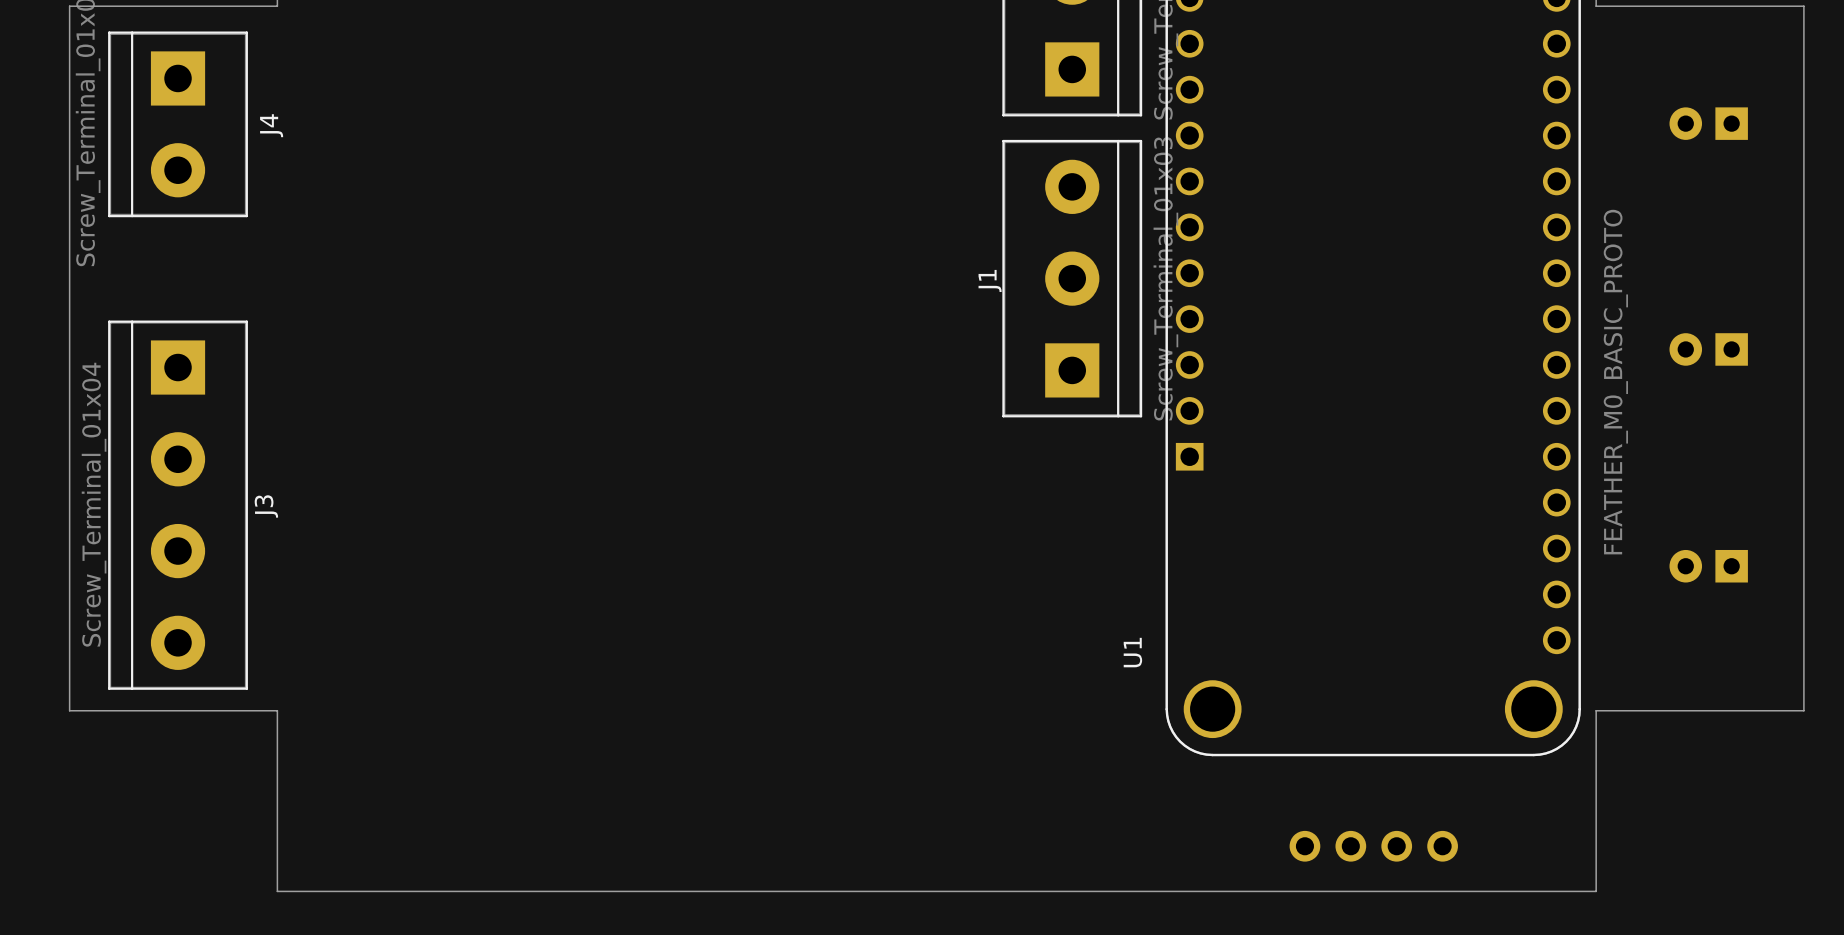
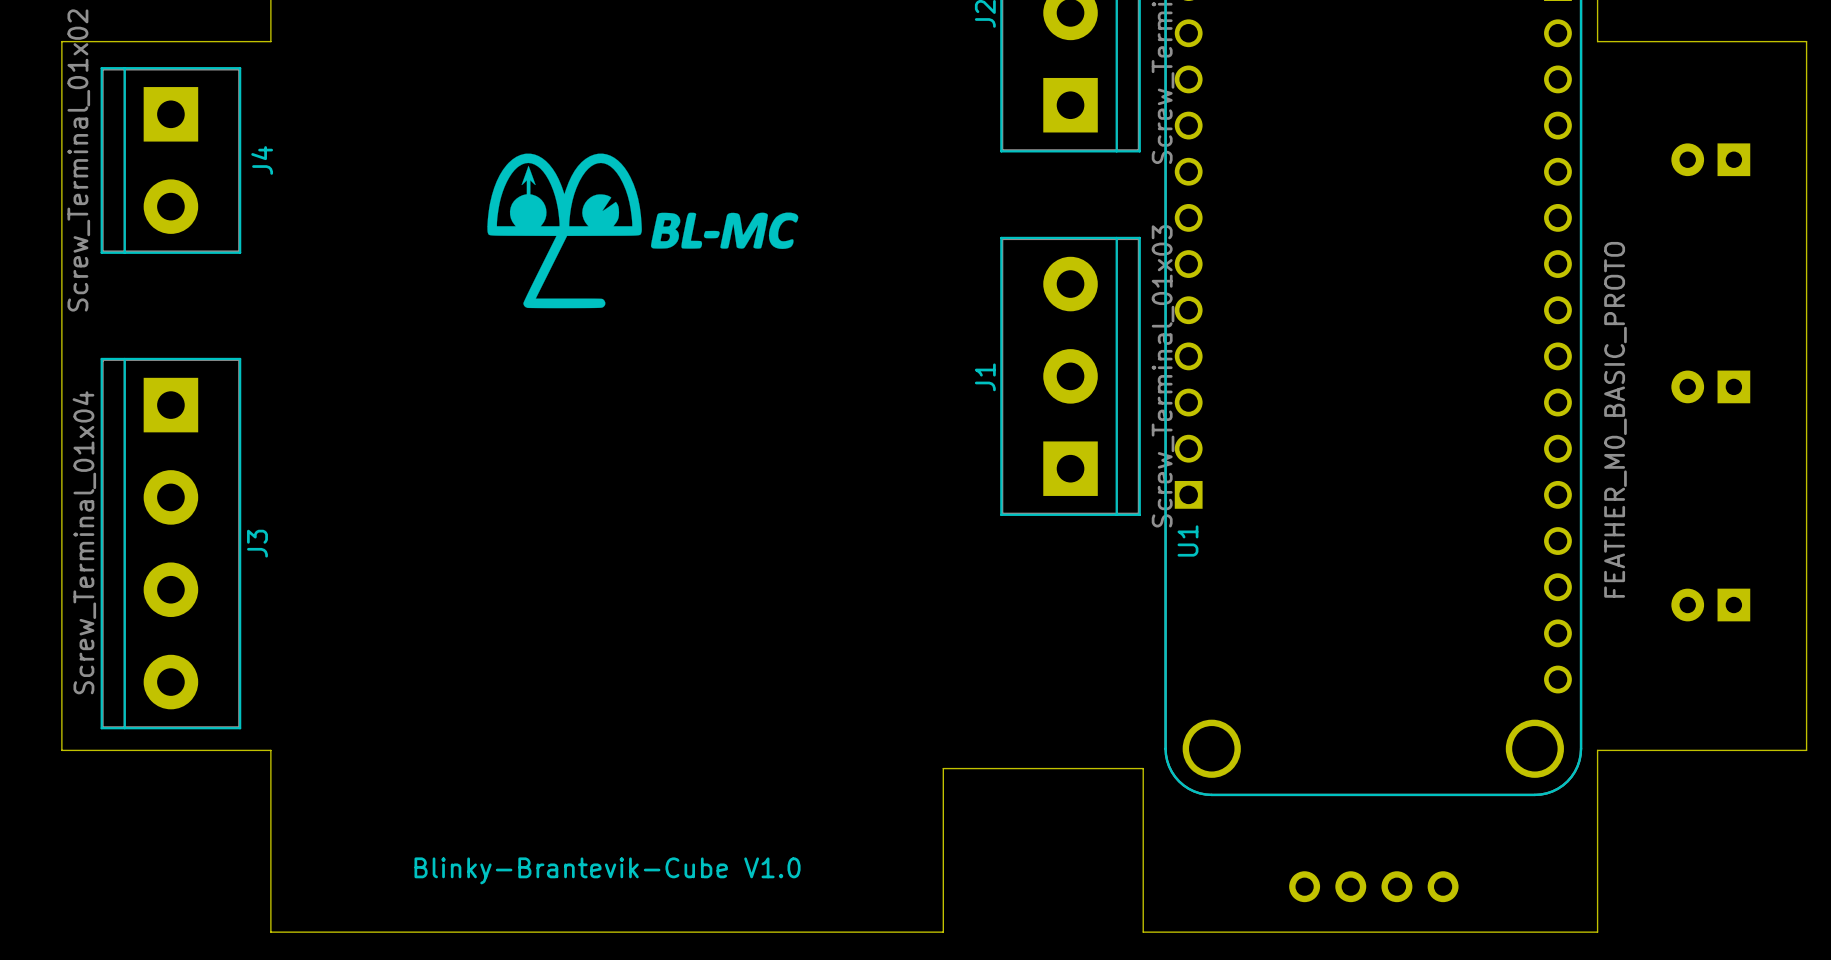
drawing: none -> [487, 153, 799, 309]
J1 position: (1072, 278) -> (1070, 376)
U1 name position: U1 (1132, 652) -> U1 (1187, 540)
text: none -> Blinky-Brantevik-Cube V1.0 (607, 870)
board edge: (945, 891) (1144, 891) -> (943, 932) (943, 768) (1143, 768) (1143, 932)

